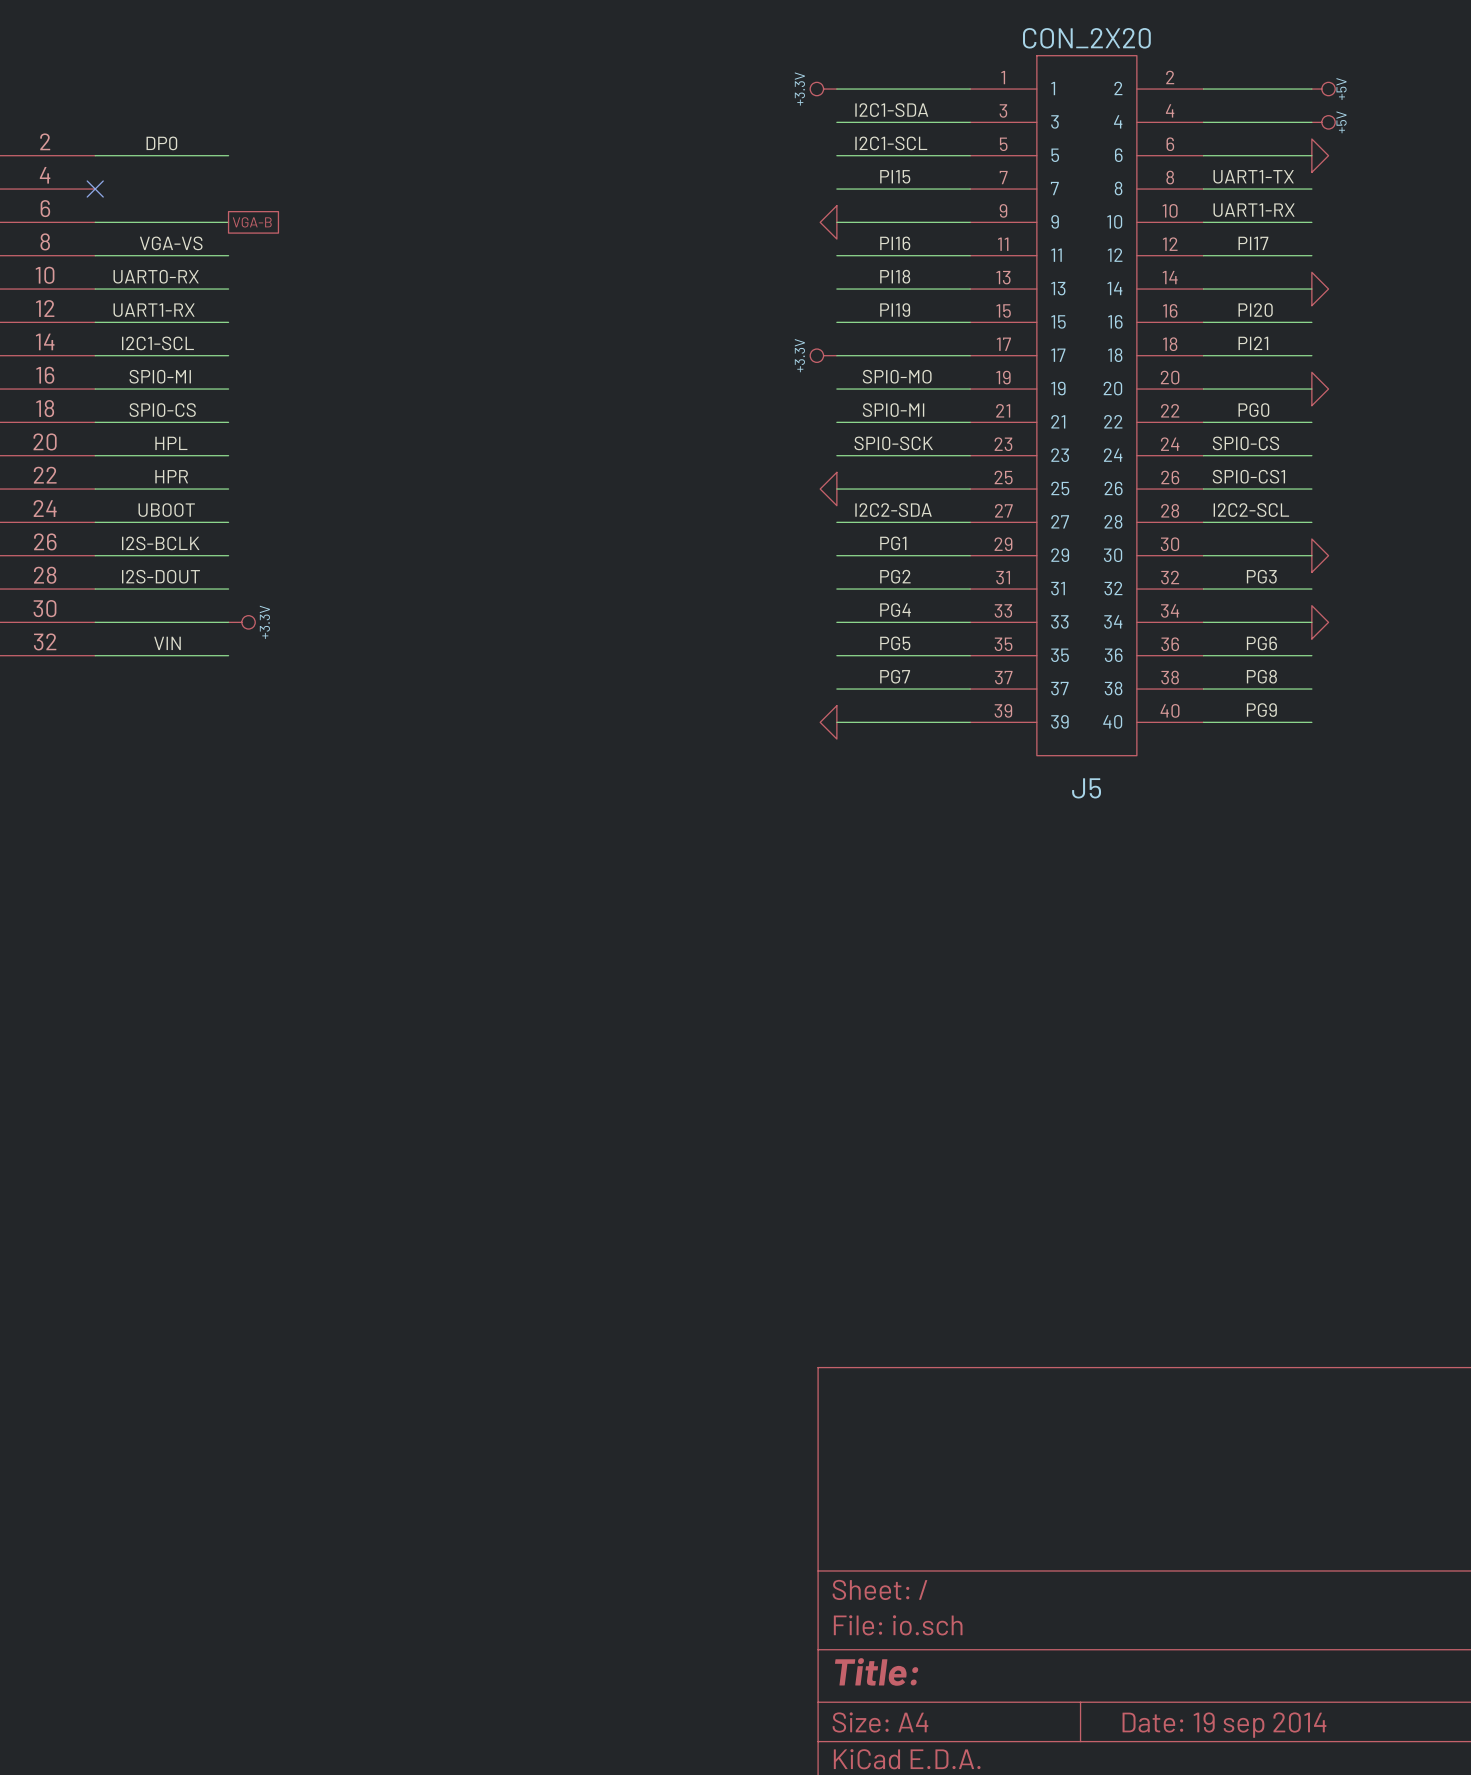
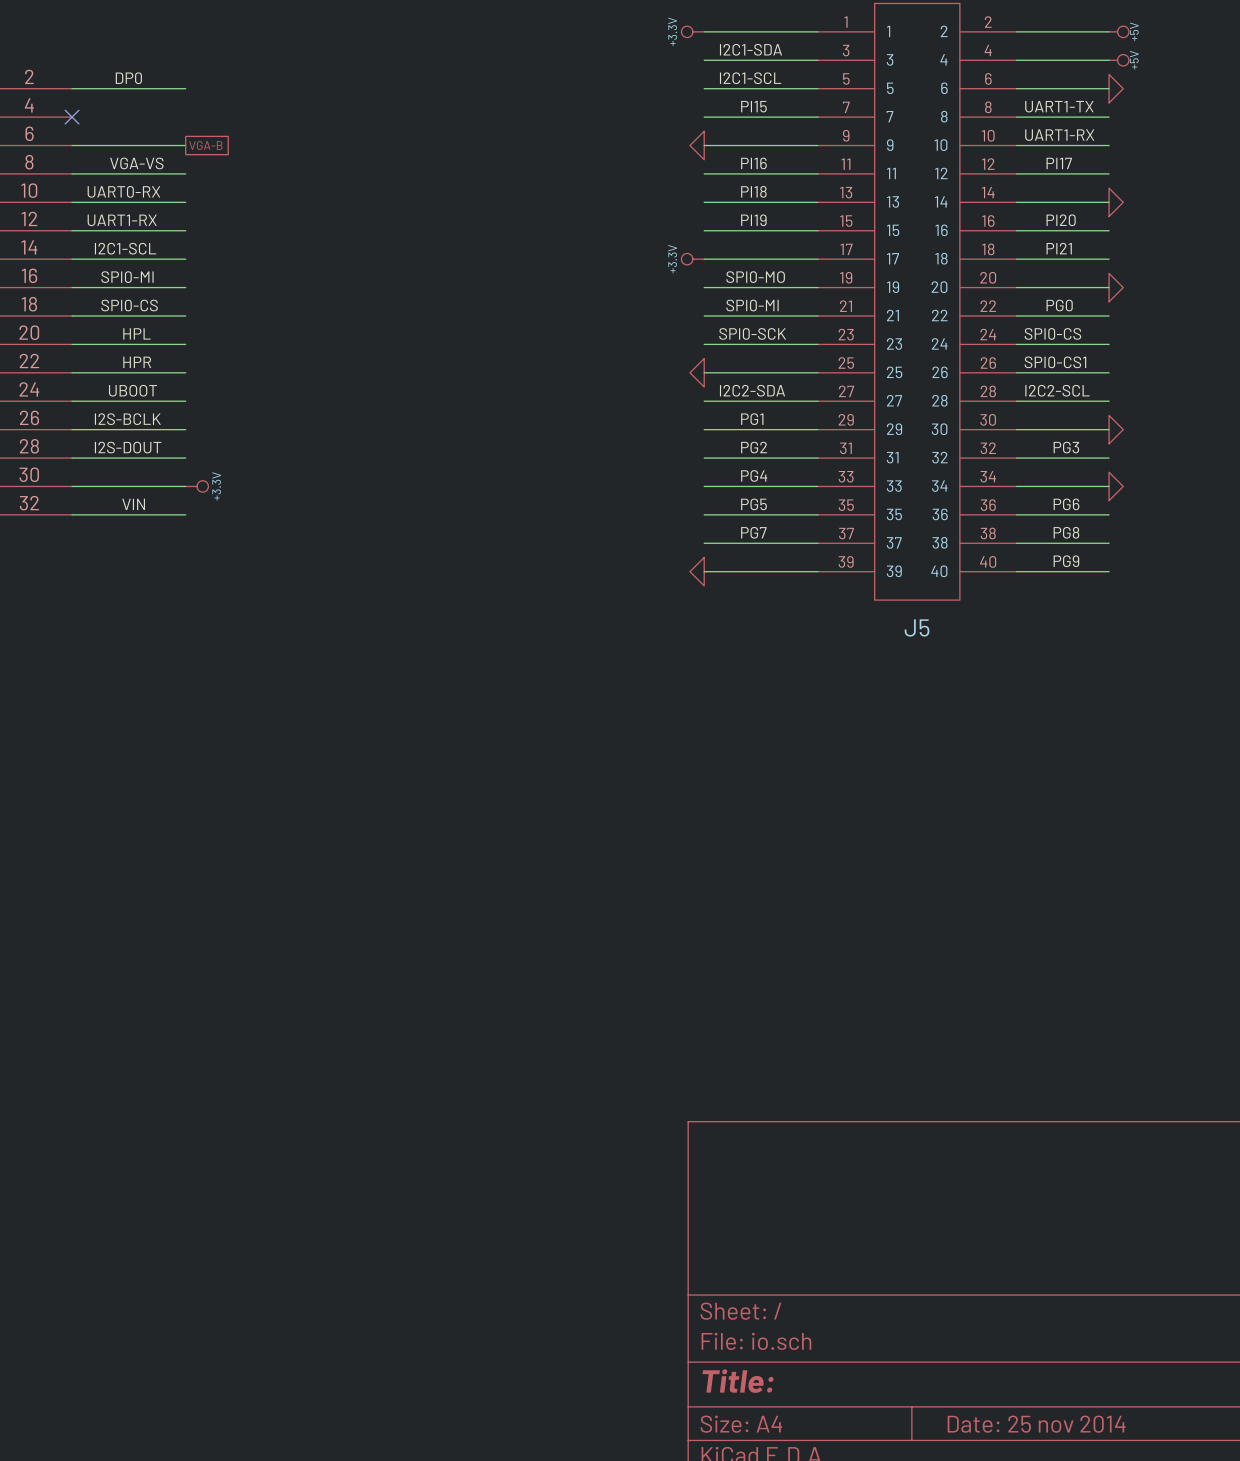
title block: Date: 19 sep 2014 (1224, 1725) -> Date: 25 nov 2014 (1036, 1424)

